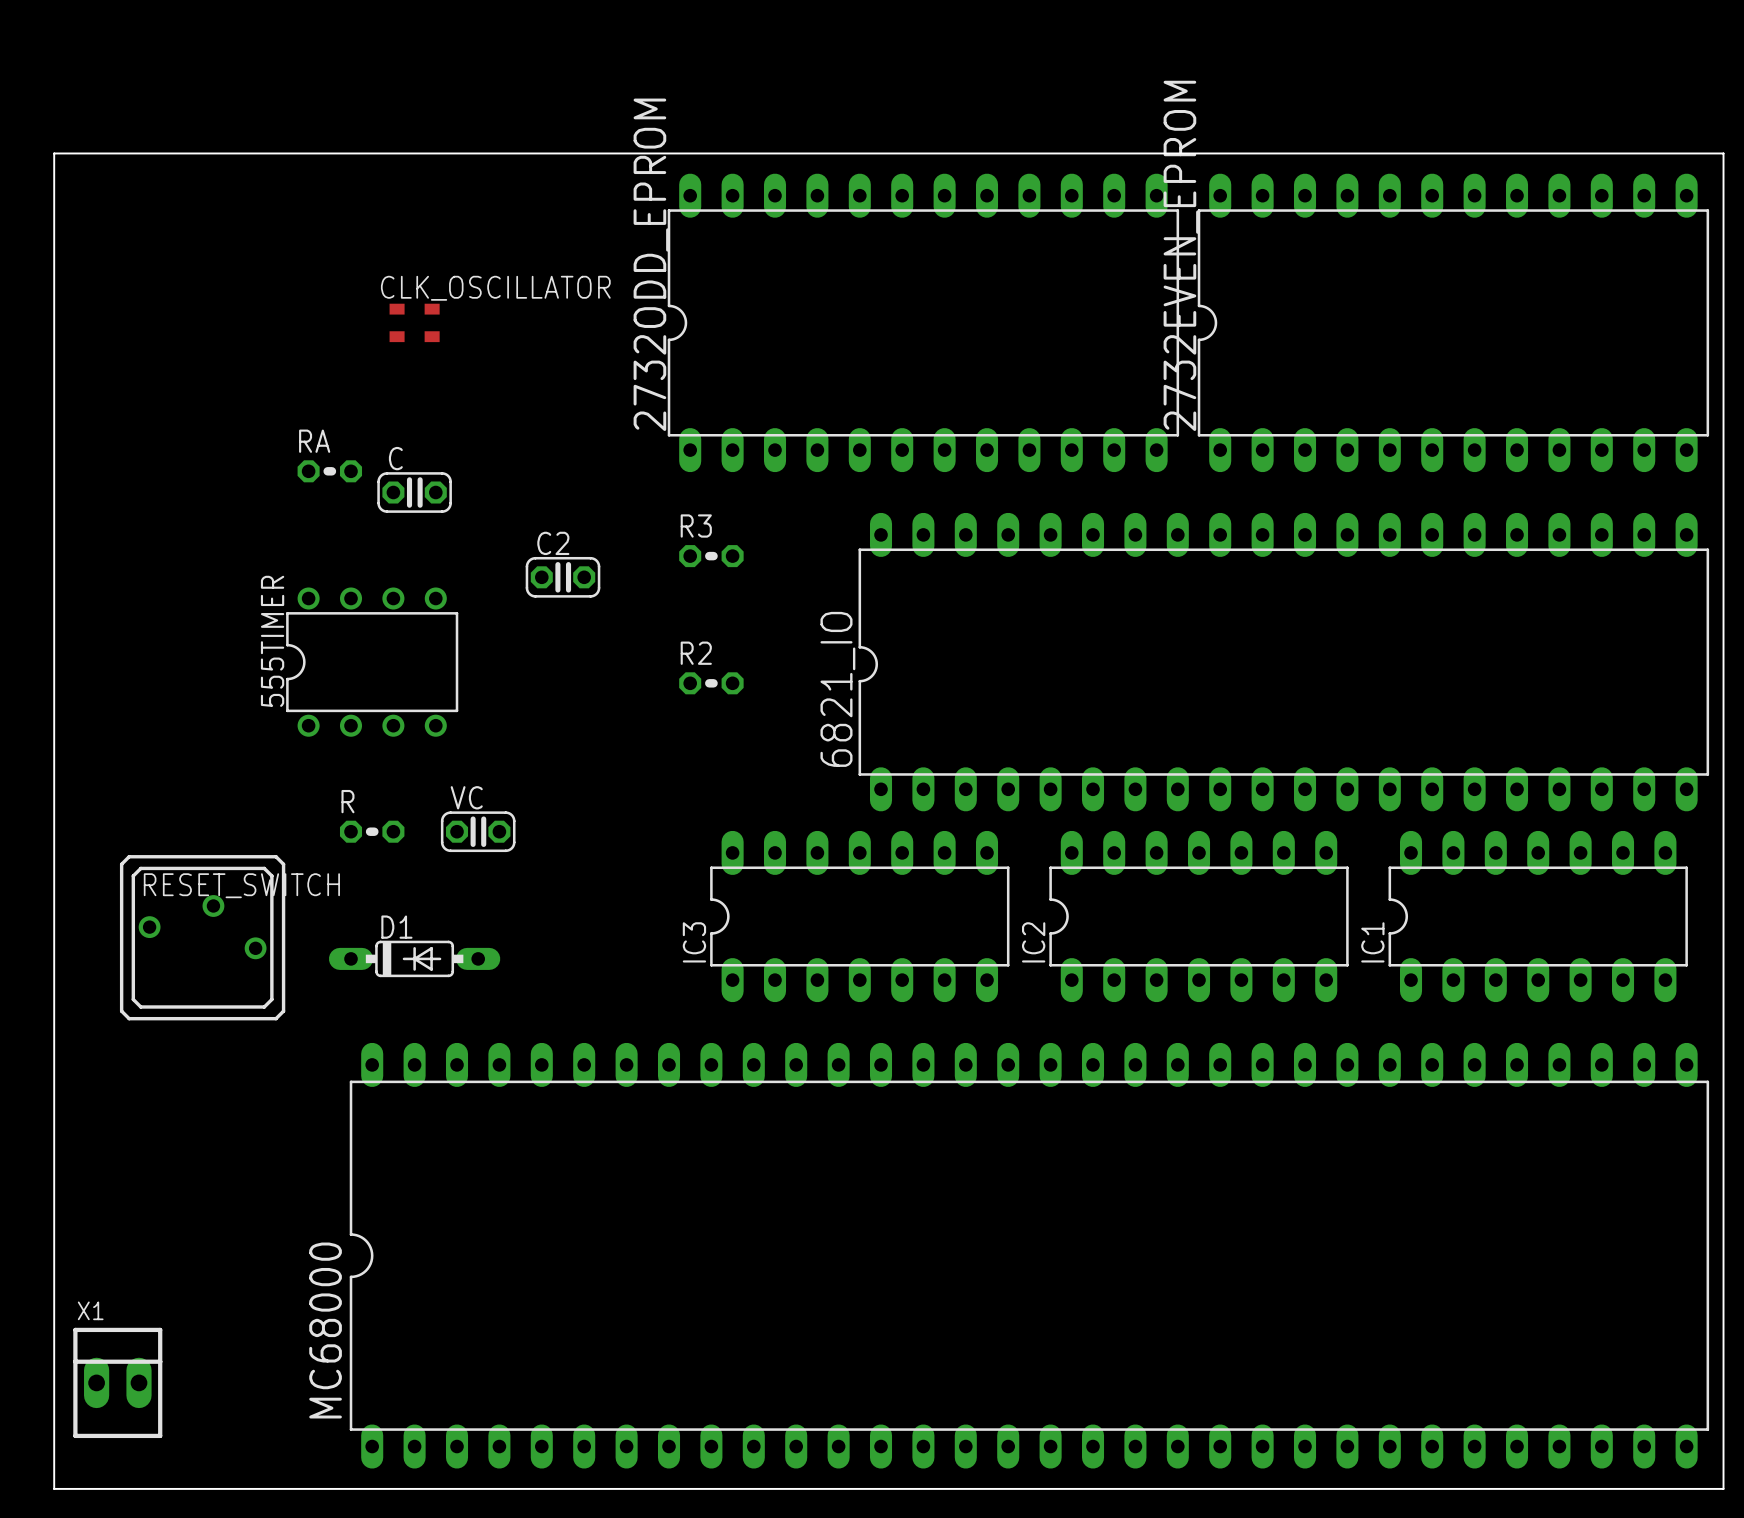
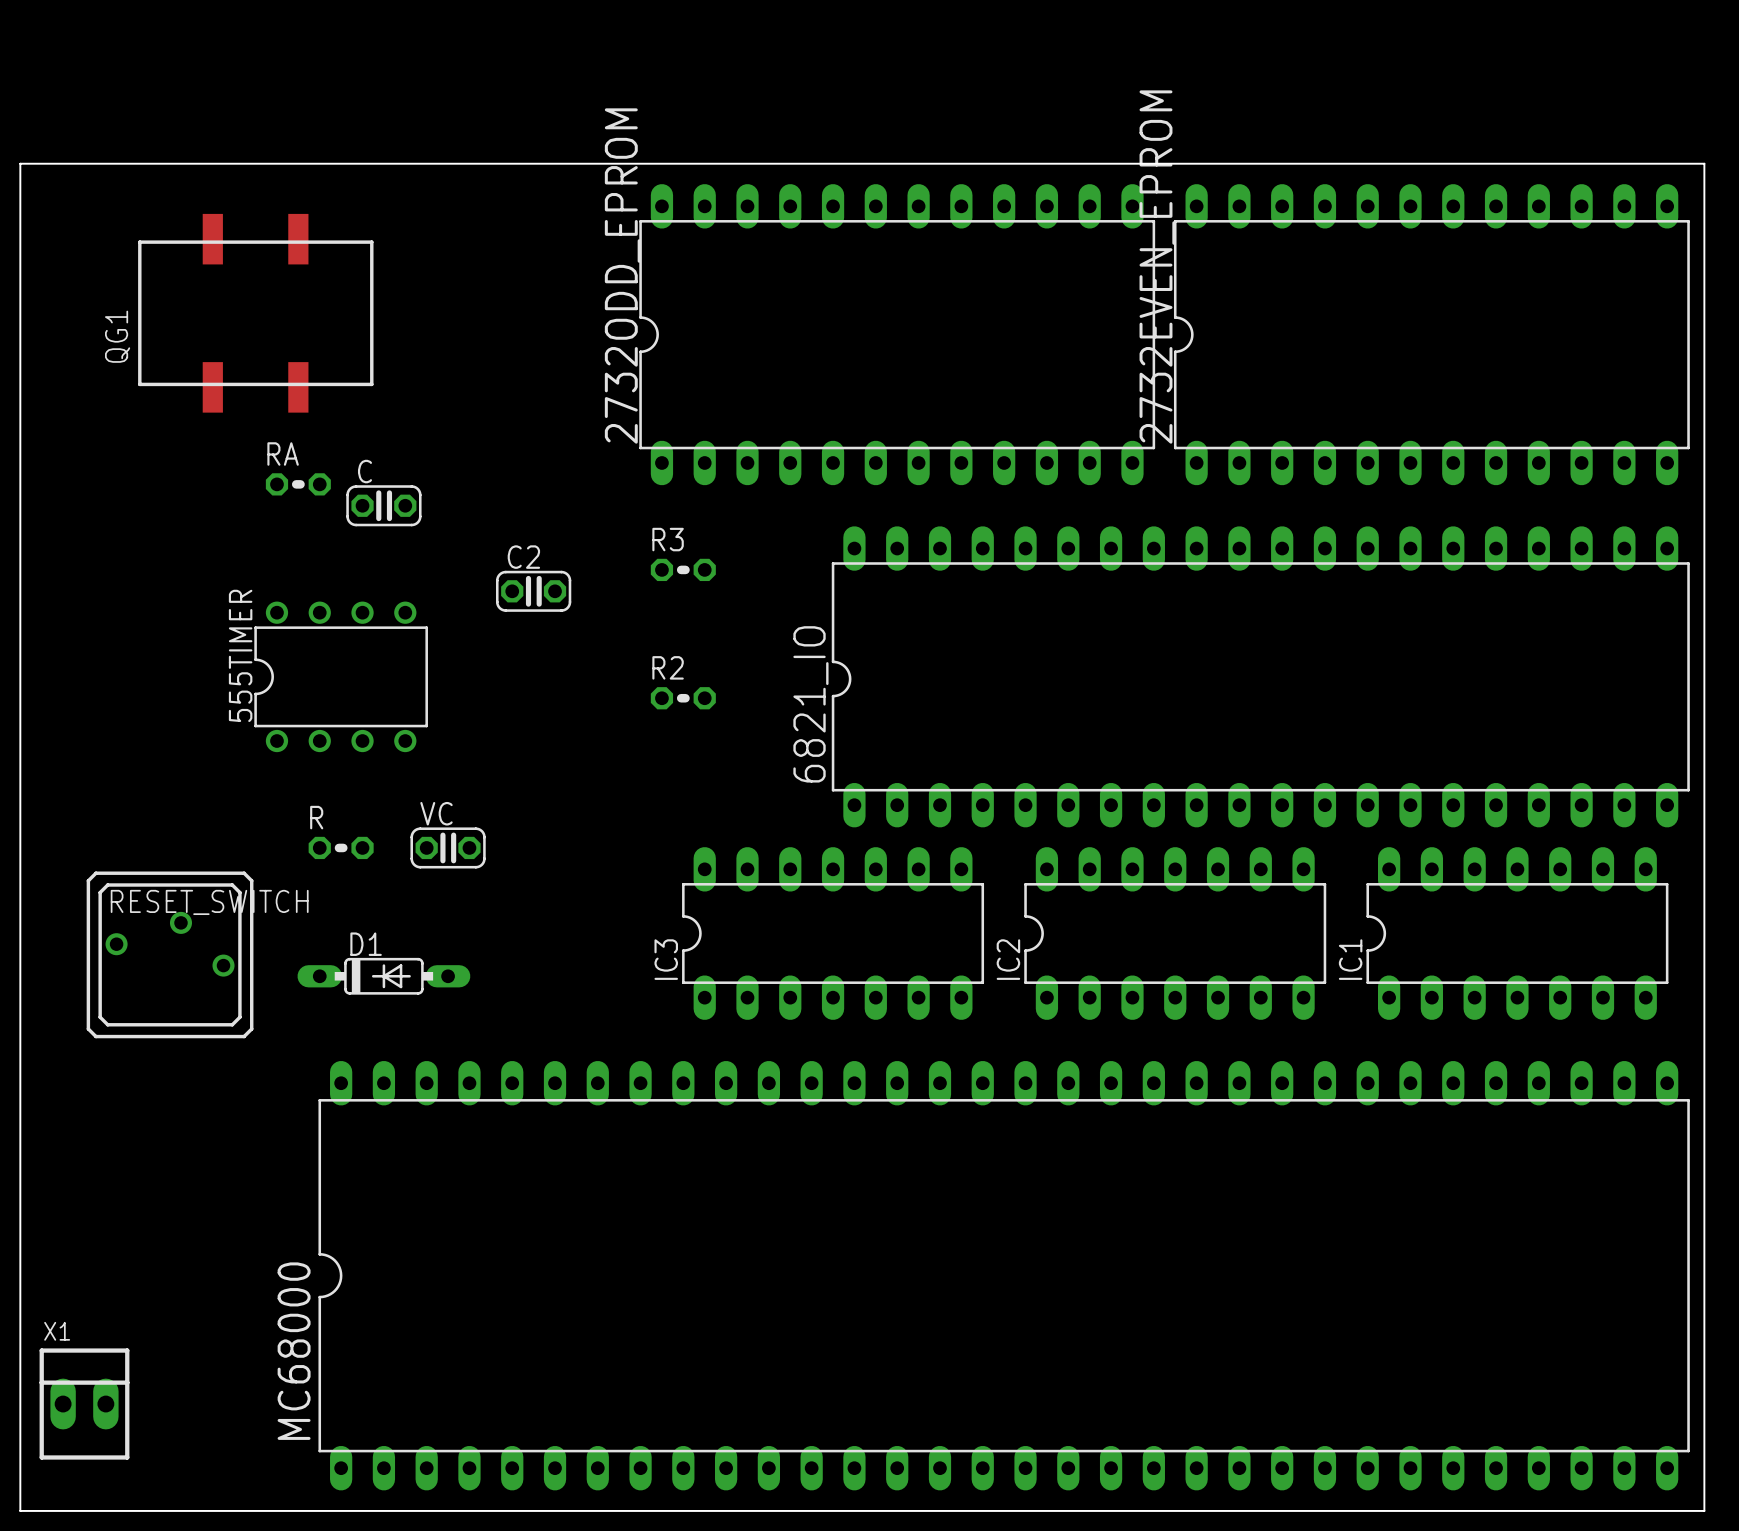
QG1: none -> (255, 313)
CLK_OSCILLATOR: (414, 322) -> none

